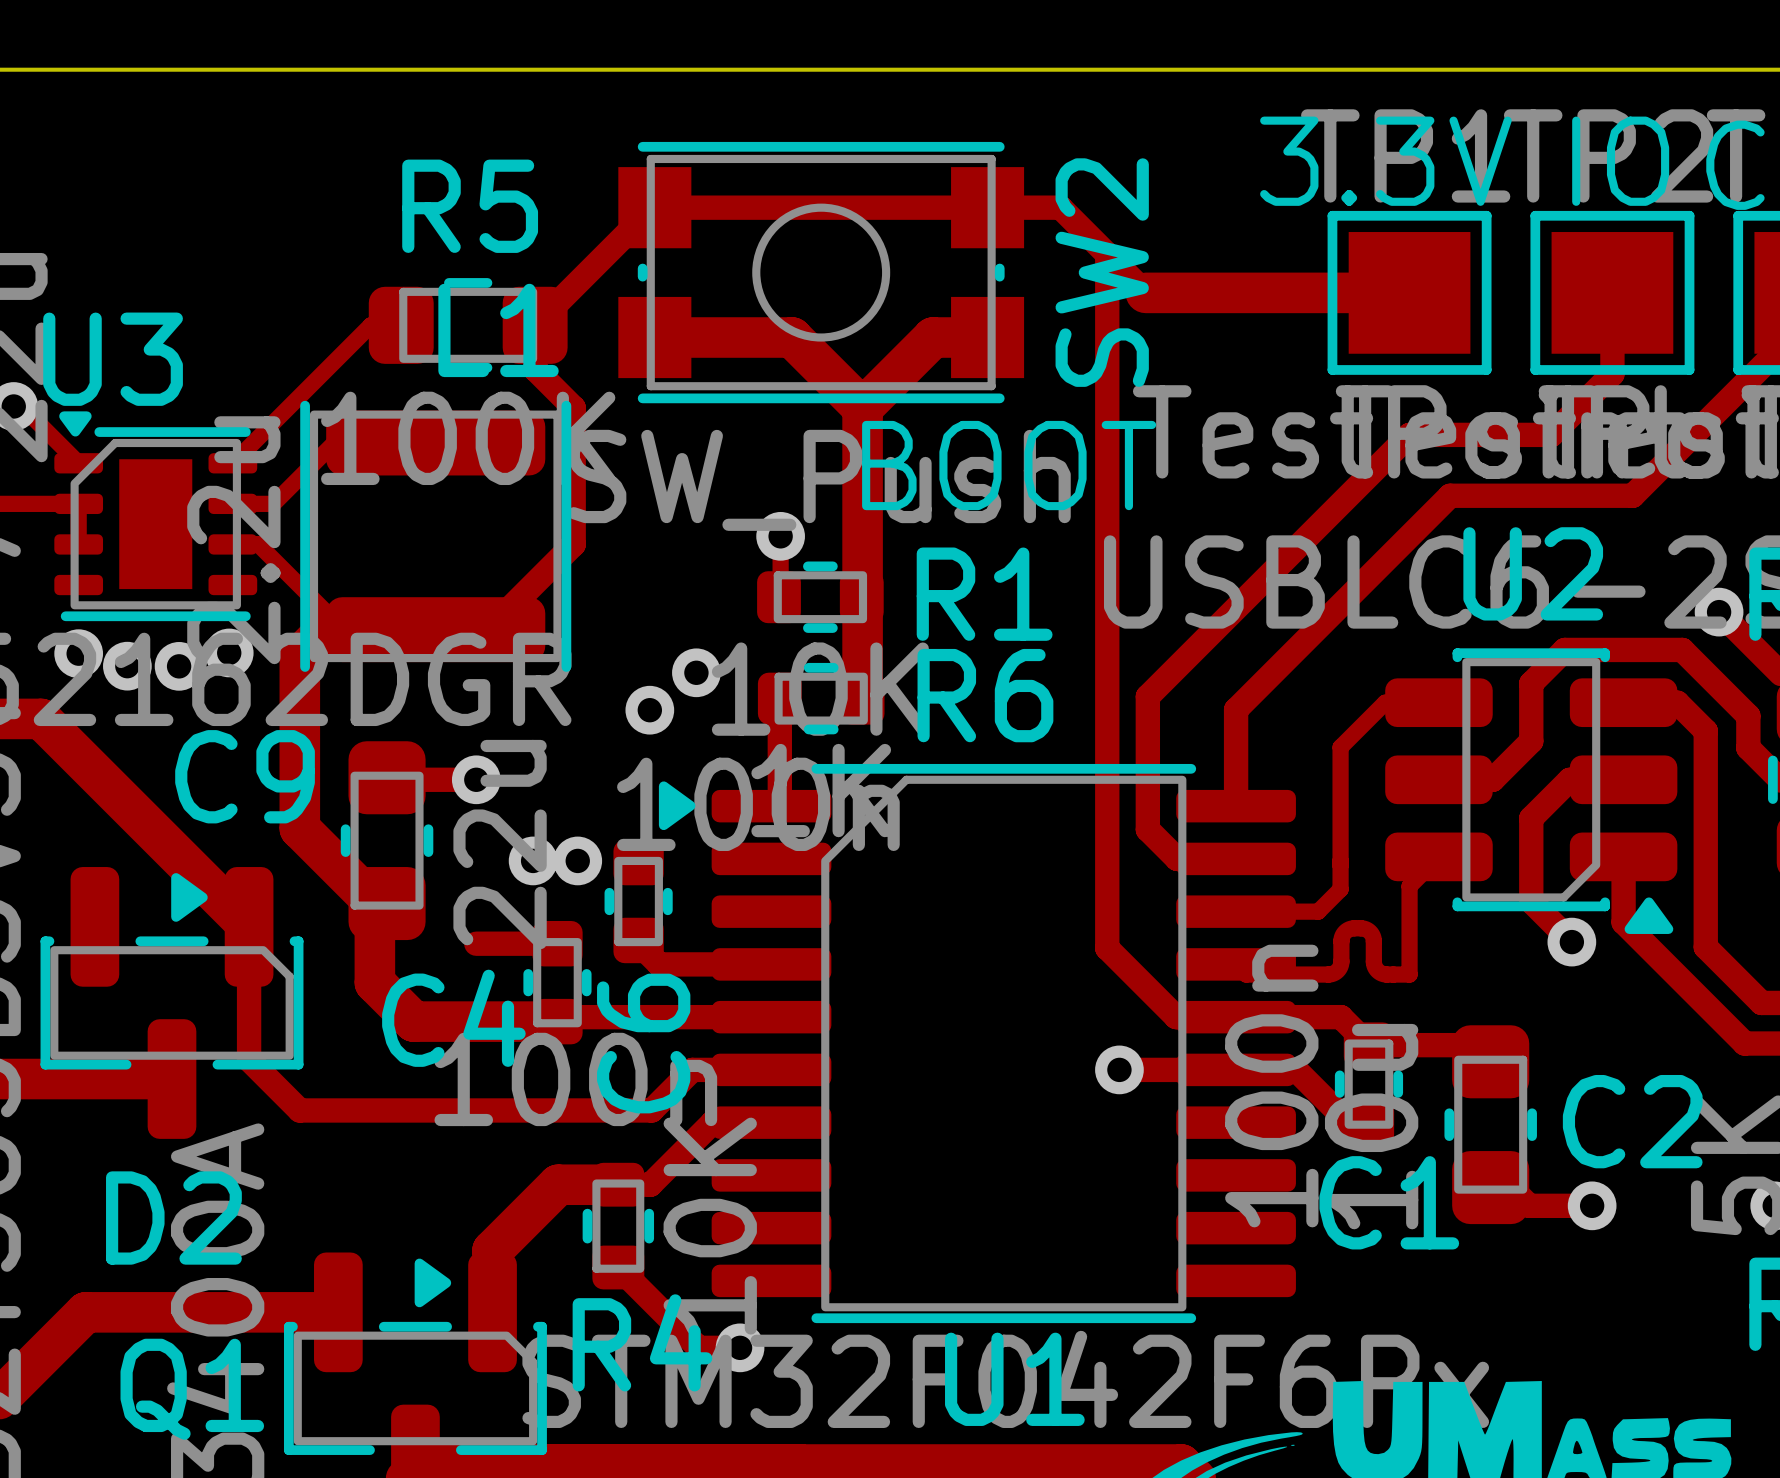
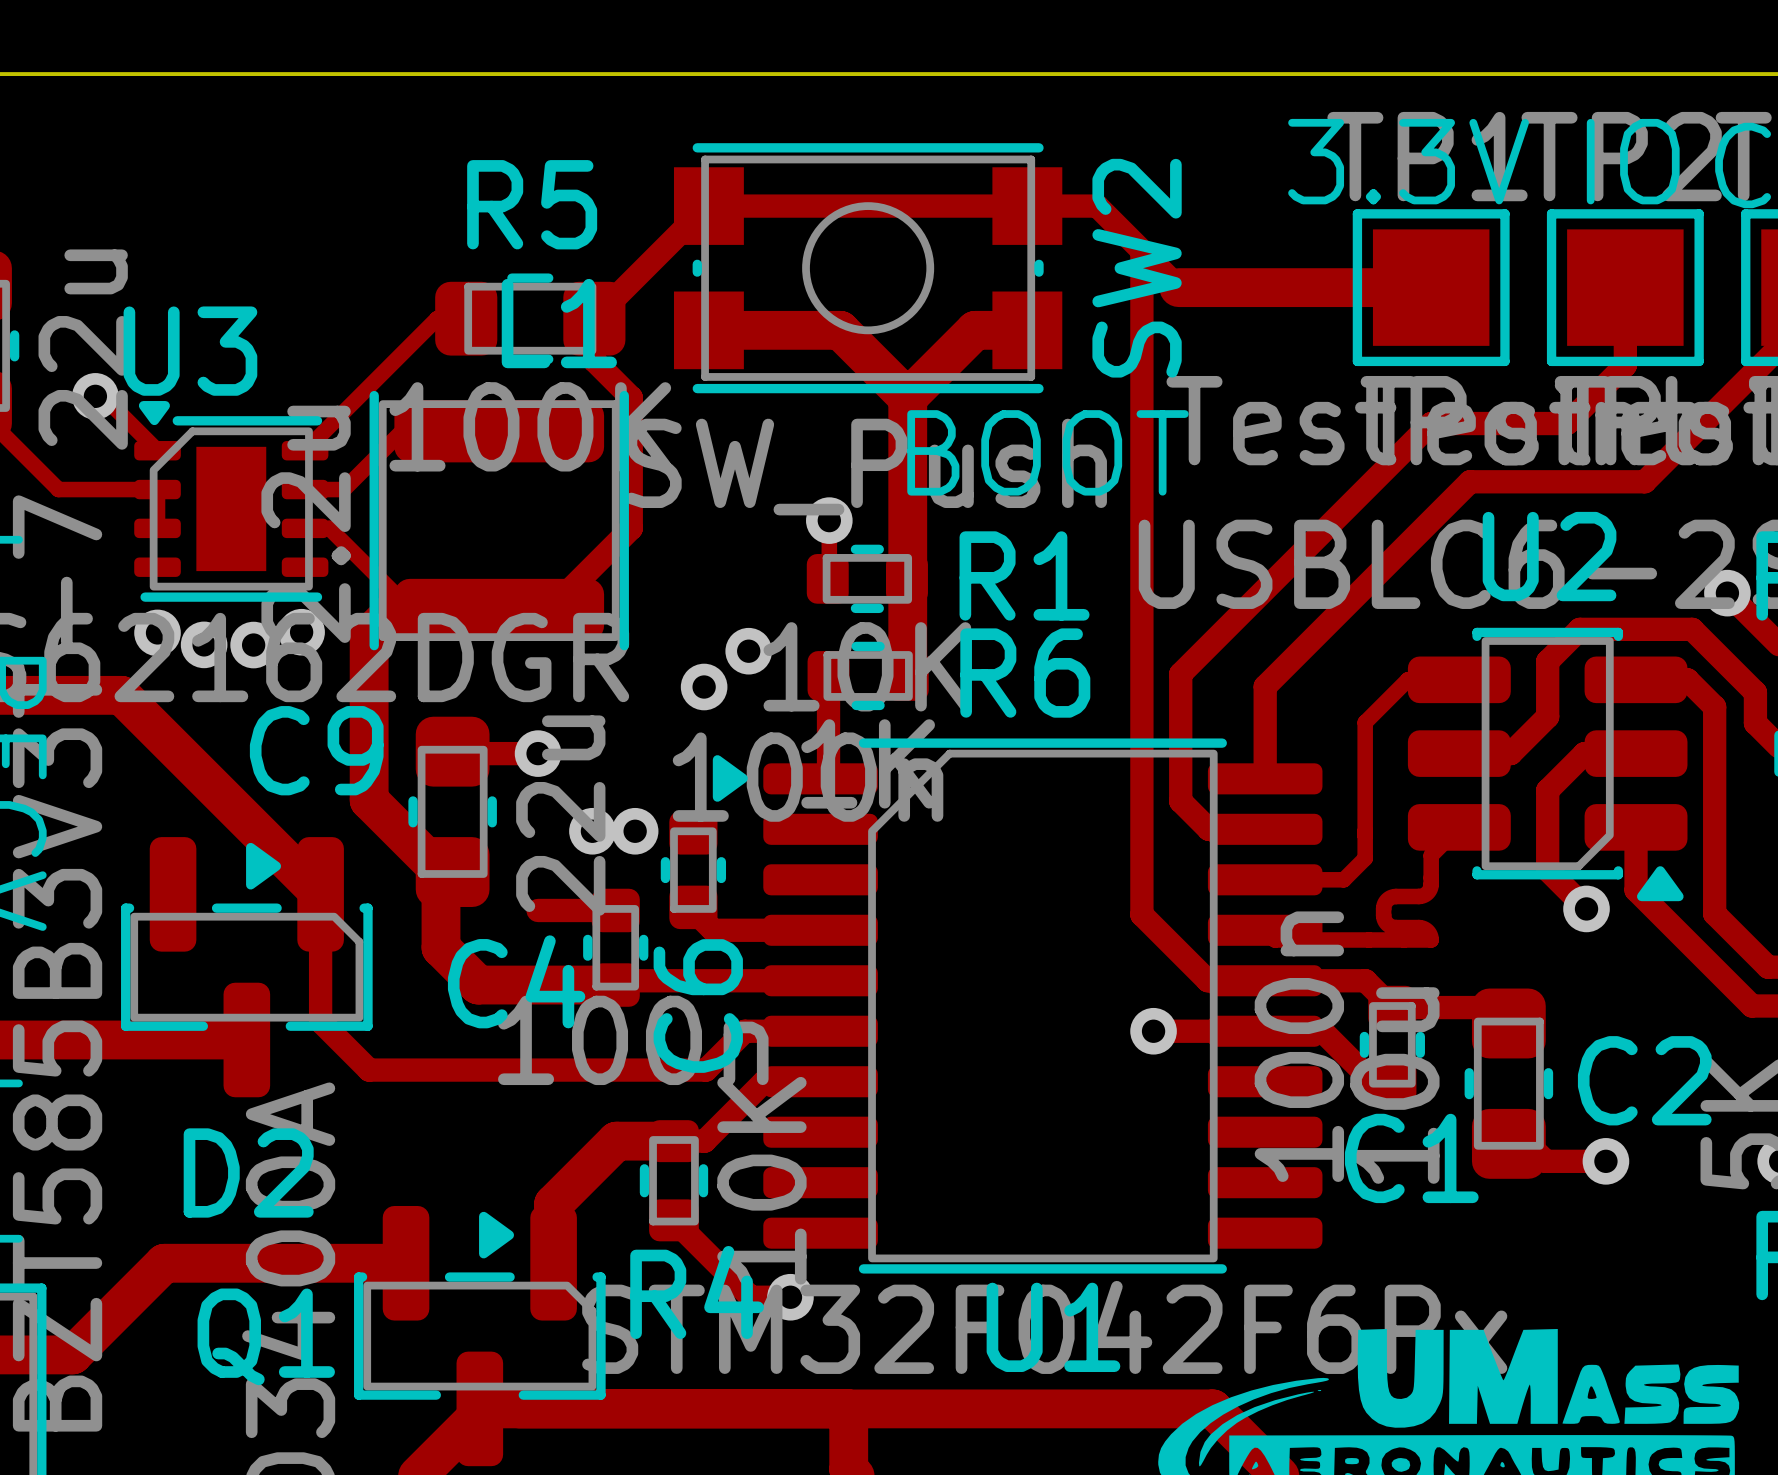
top track: (1409, 916) (1409, 974) -> (1431, 884) (1428, 891) (1423, 895) (1389, 898) (1385, 902) (1383, 908) (1384, 919) (1389, 925) (1423, 928) (1429, 933) (1431, 939)
top track: (1328, 974) (1334, 972) (1339, 968) (1342, 936) (1347, 930) (1354, 928) (1364, 928) (1371, 933) (1373, 939) (1374, 966) (1378, 971) (1386, 974) -> (1353, 939) (1409, 939)

